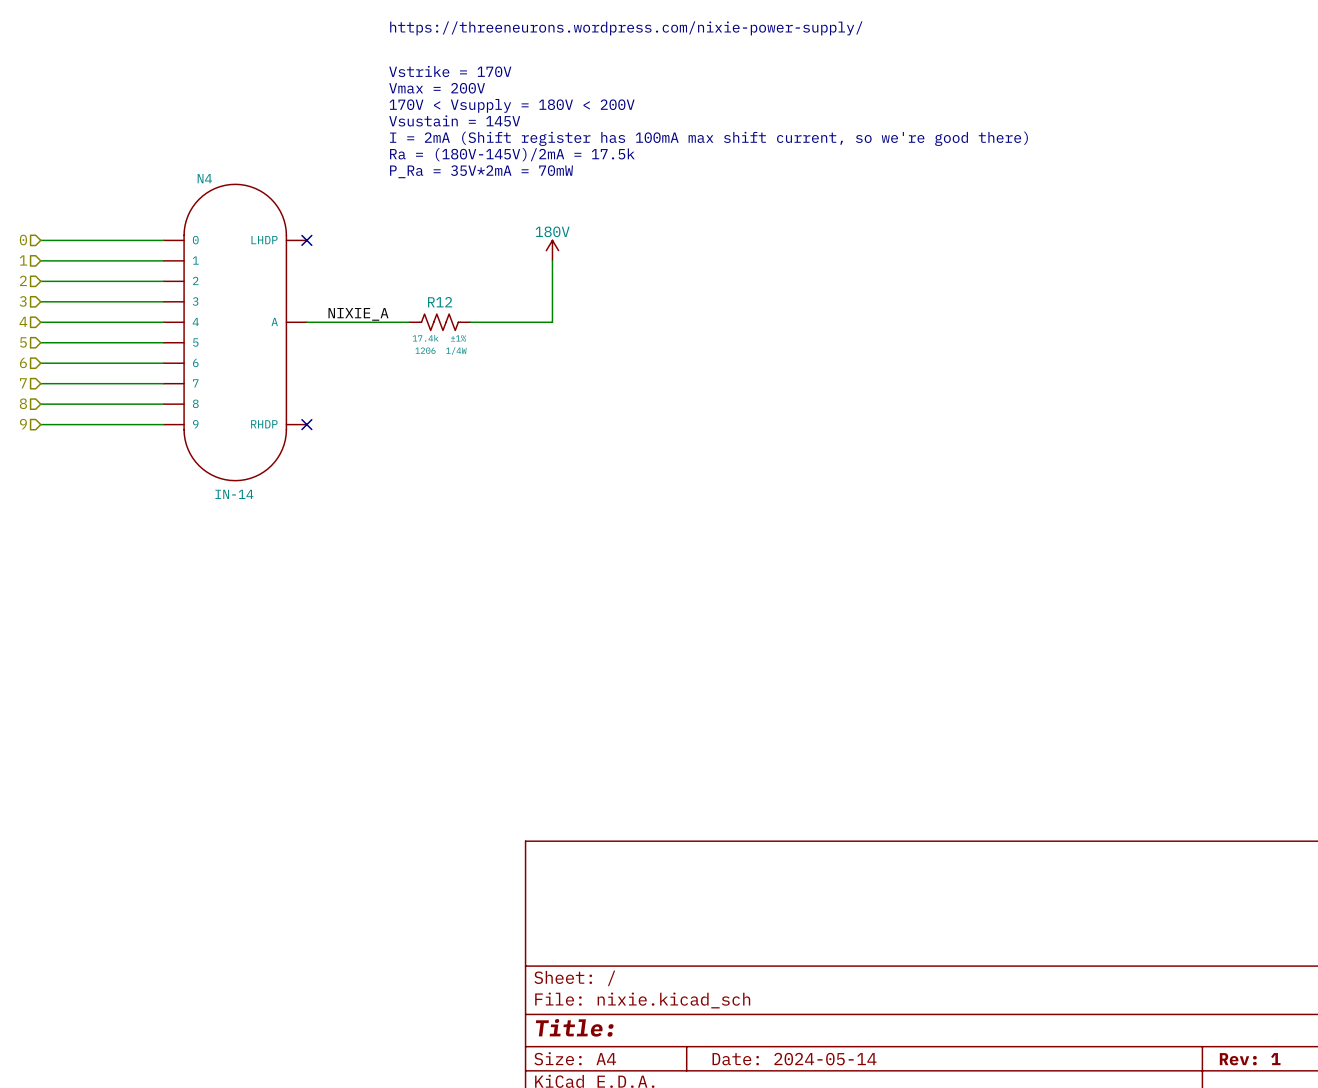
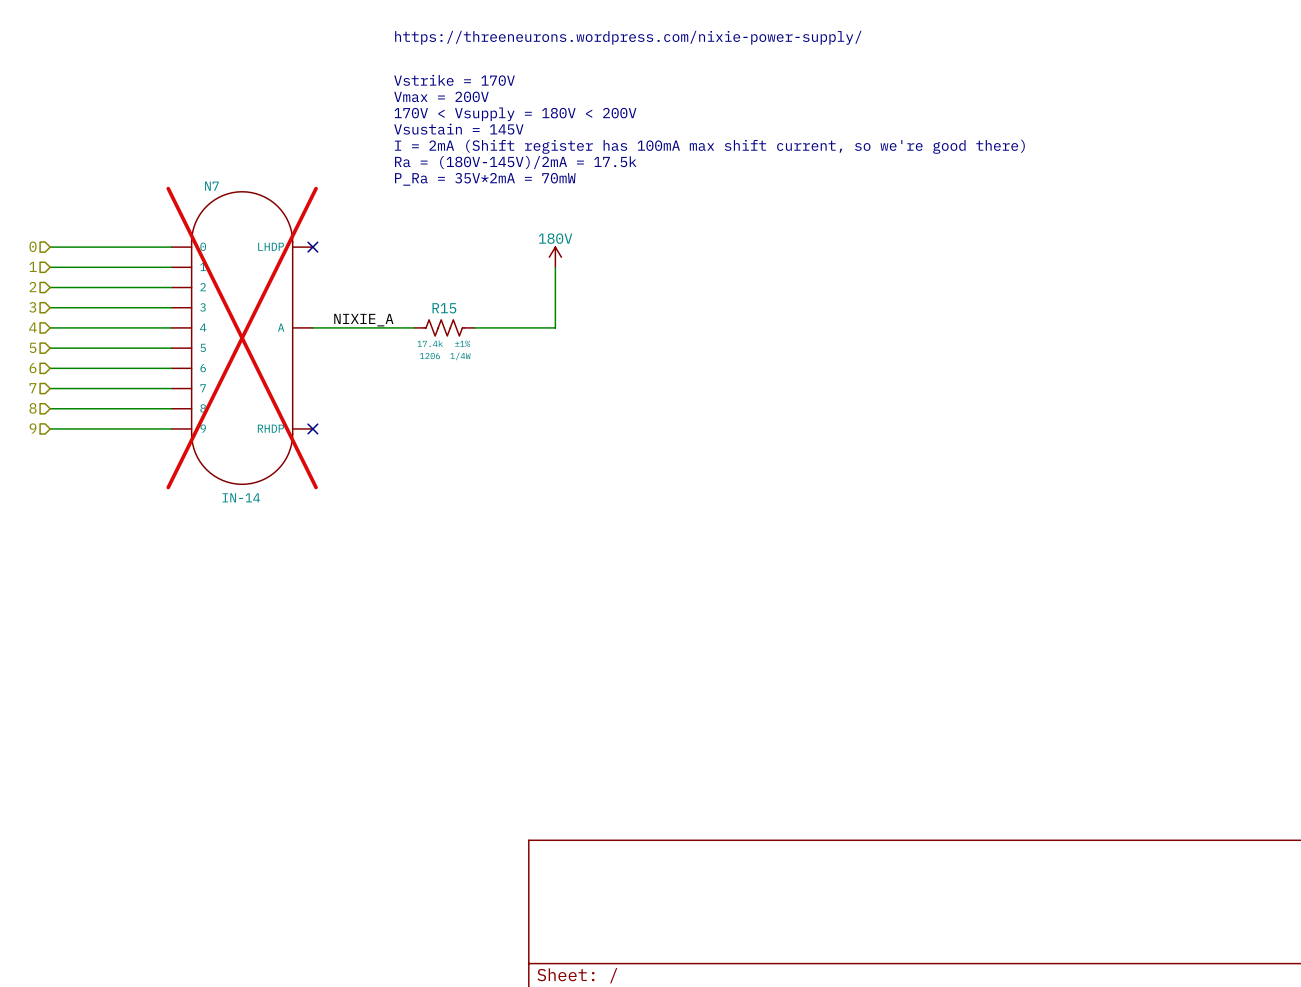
N4 name: N4 (204, 178) -> N7 (211, 186)
R12 name: R12 (440, 302) -> R15 (444, 308)
N4 do-not-place cross: none -> (242, 338)

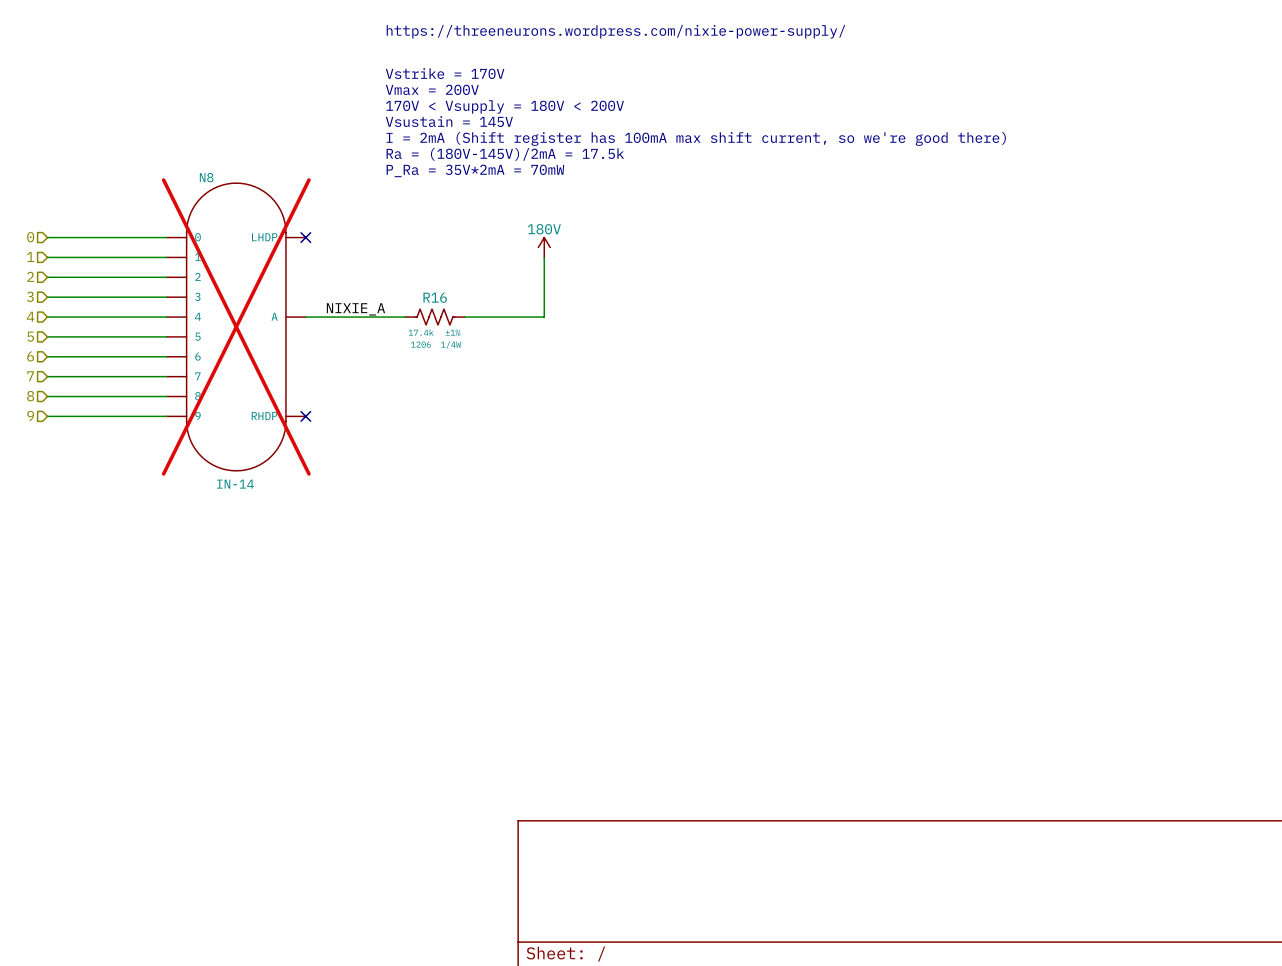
N7 name: N7 (211, 186) -> N8 (206, 177)
R15 name: R15 (444, 308) -> R16 (435, 297)

